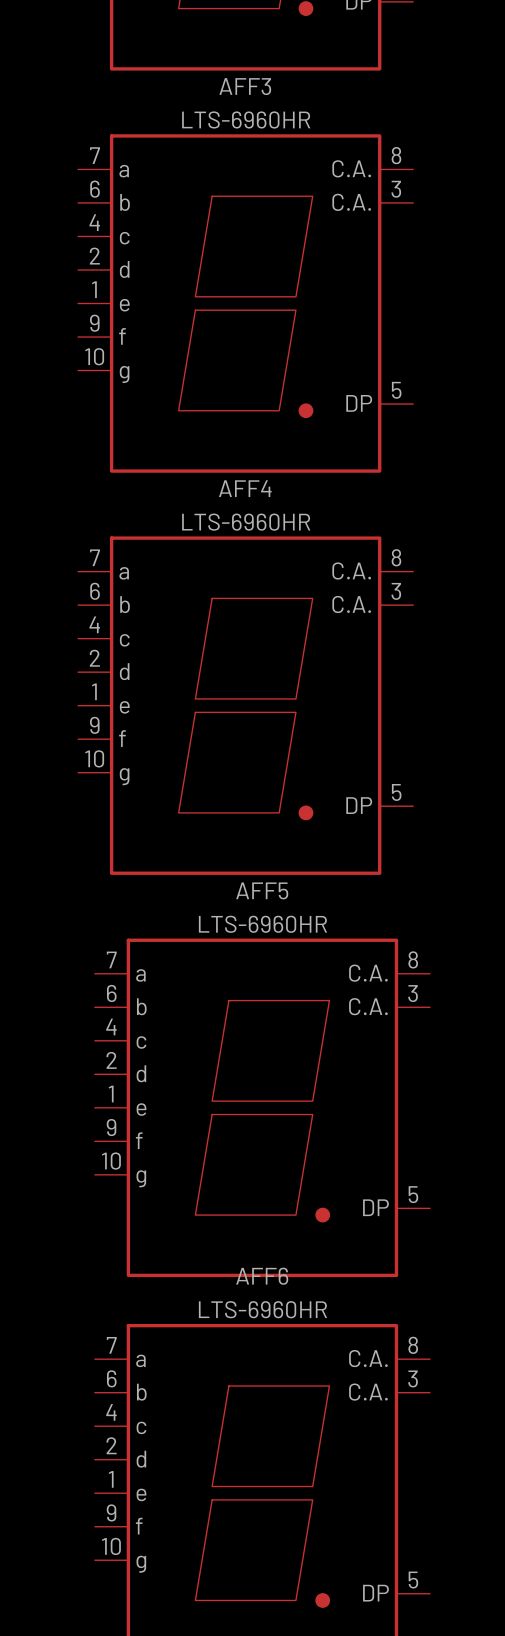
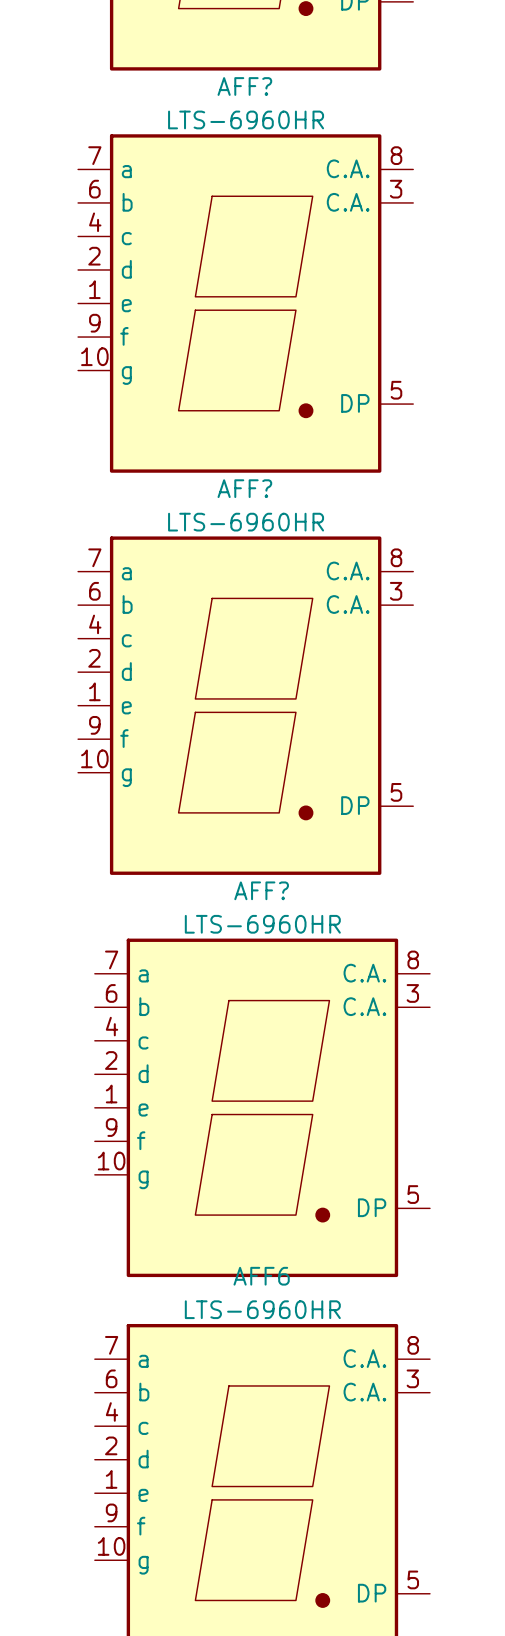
AFF3 name: AFF3 (245, 86) -> AFF? (244, 86)
AFF4 name: AFF4 (245, 488) -> AFF? (244, 488)
AFF5 name: AFF5 (262, 890) -> AFF? (261, 890)

